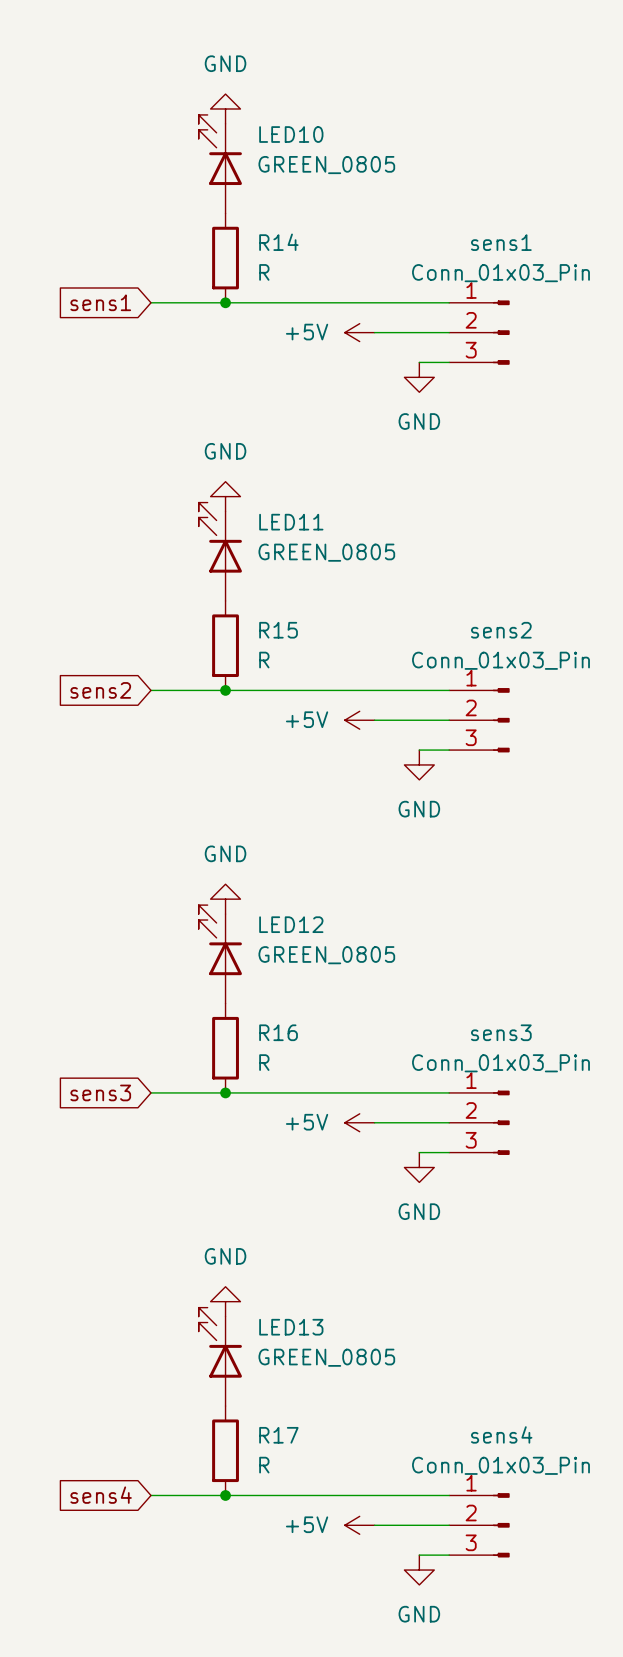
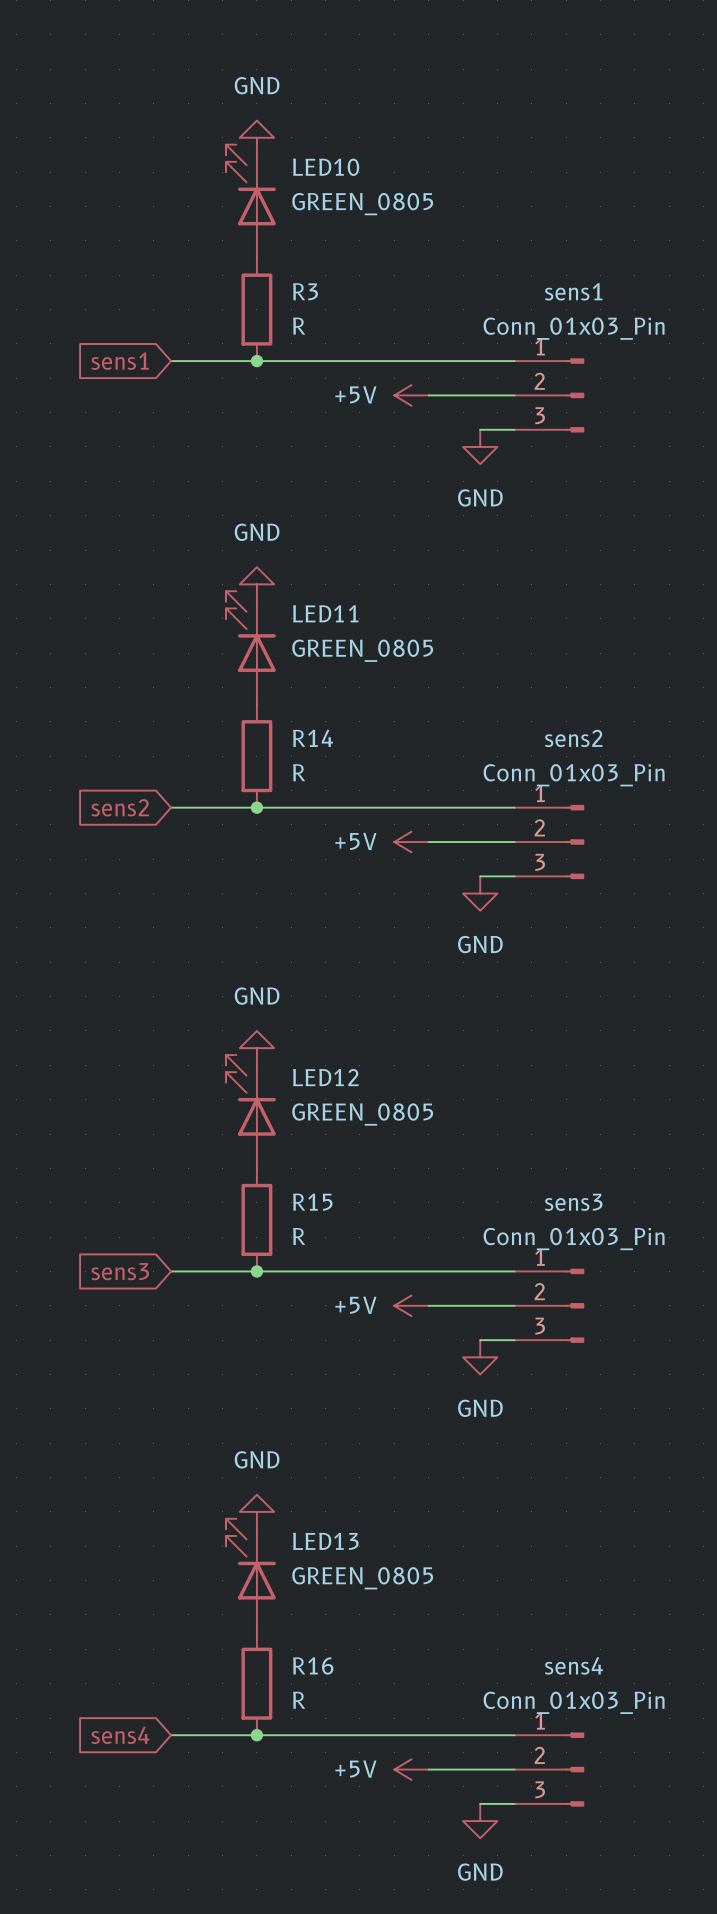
R14 name: R14 (278, 242) -> R3 (305, 291)
R15 name: R15 (278, 630) -> R14 (313, 738)
R16 name: R16 (278, 1032) -> R15 (312, 1202)
R17 name: R17 (278, 1435) -> R16 (313, 1665)

